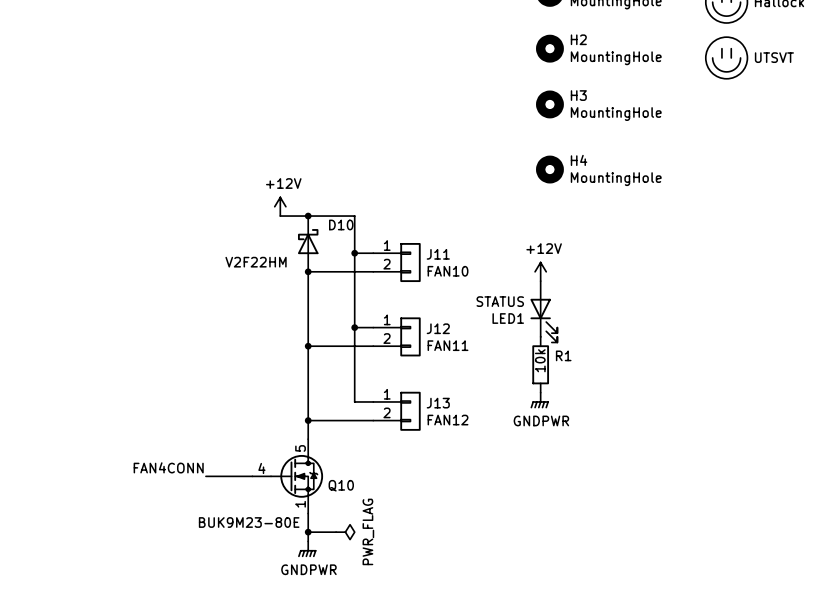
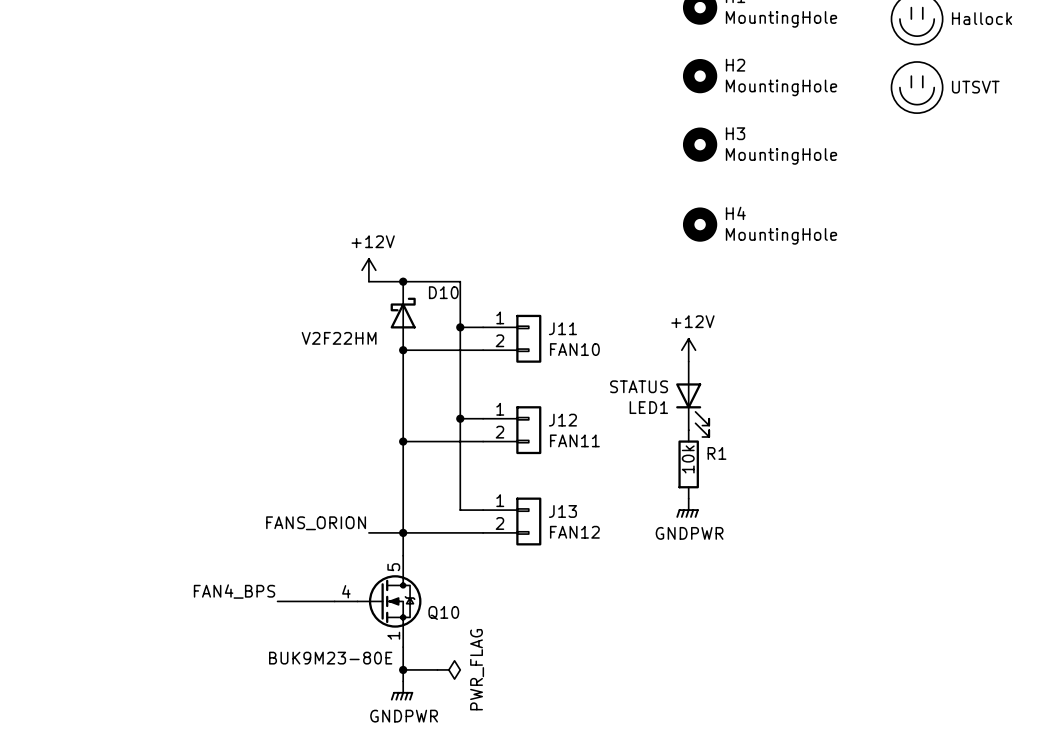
label: none -> FANS_ORION (316, 523)
wire: none -> (368, 532) (403, 532)
label: FAN4CONN (168, 467) -> FAN4_BPS (234, 591)

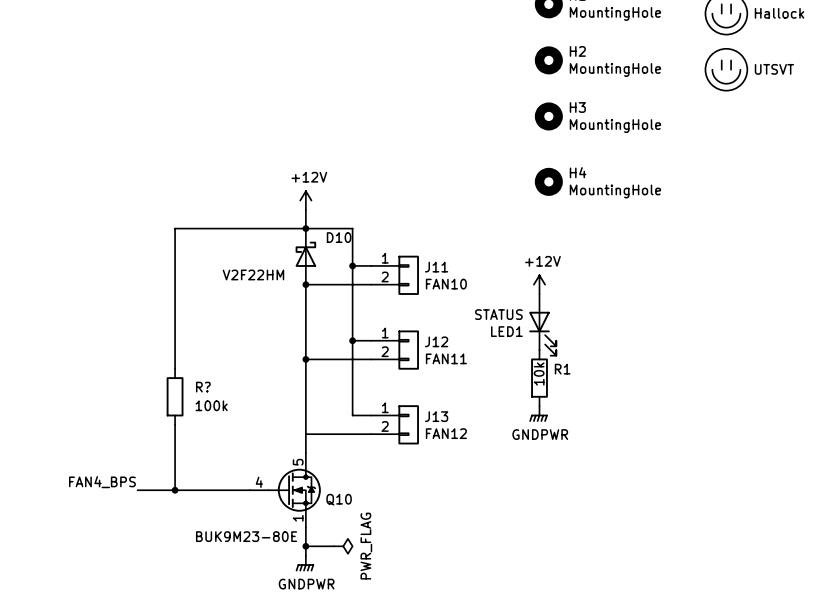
wire: none -> (305, 209) (305, 228)
power symbol position: +12V (368, 270) -> +12V (305, 200)
wire: none -> (277, 228) (175, 228) (175, 368)
R?: none -> 100k (175, 396)
wire: none -> (175, 424) (175, 490)
label: FANS_ORION (316, 523) -> none
wire: (368, 532) (403, 532) -> none
junction: (403, 532) -> none
label position: FAN4_BPS (234, 591) -> FAN4_BPS (102, 482)
wire: none -> (137, 490) (203, 490)
junction: none -> (175, 490)

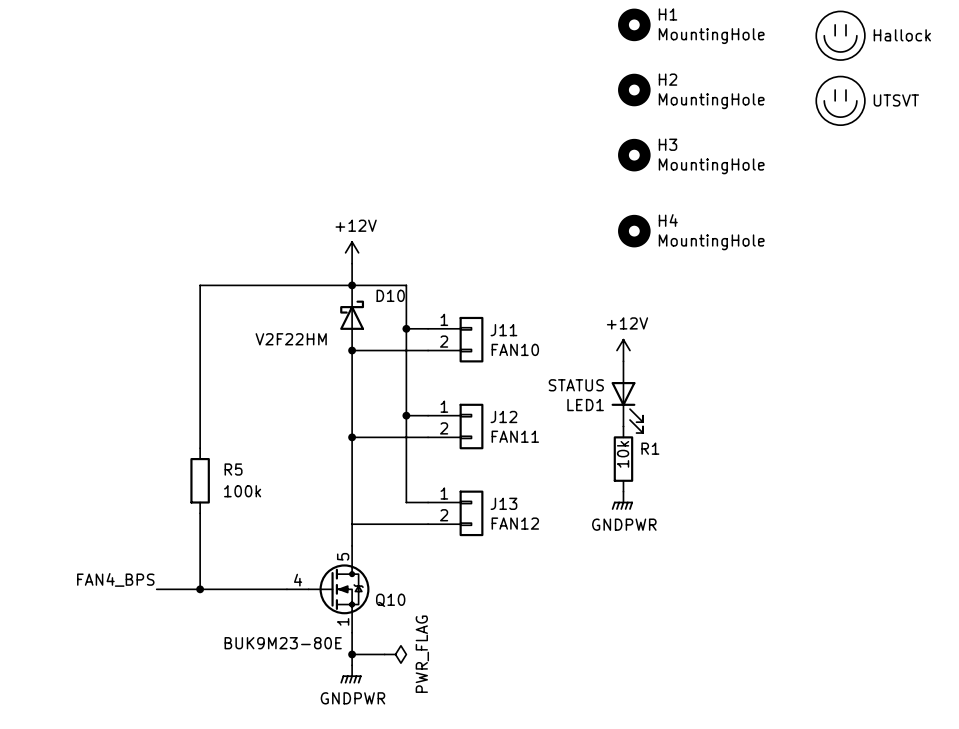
R? name: R? (203, 387) -> R5 (233, 469)

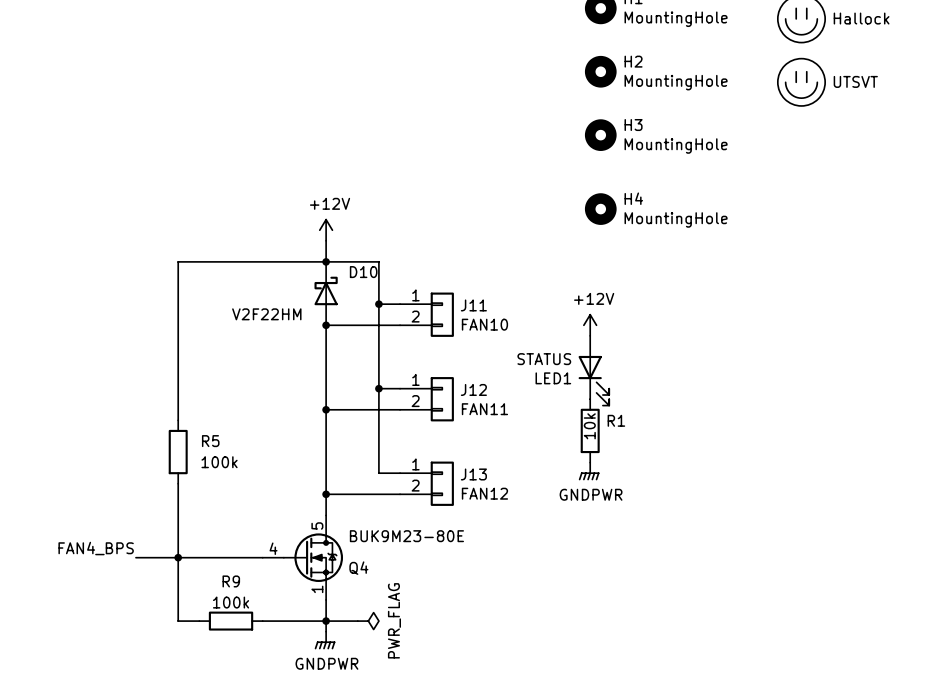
junction: none -> (326, 494)
wire: none -> (178, 557) (178, 621) (199, 621)
Q10 name: Q10 (390, 600) -> Q4 (358, 568)
Q10 value position: BUK9M23-80E (283, 643) -> BUK9M23-80E (406, 536)
R9: none -> 100k (231, 621)
wire: none -> (262, 621) (326, 621)

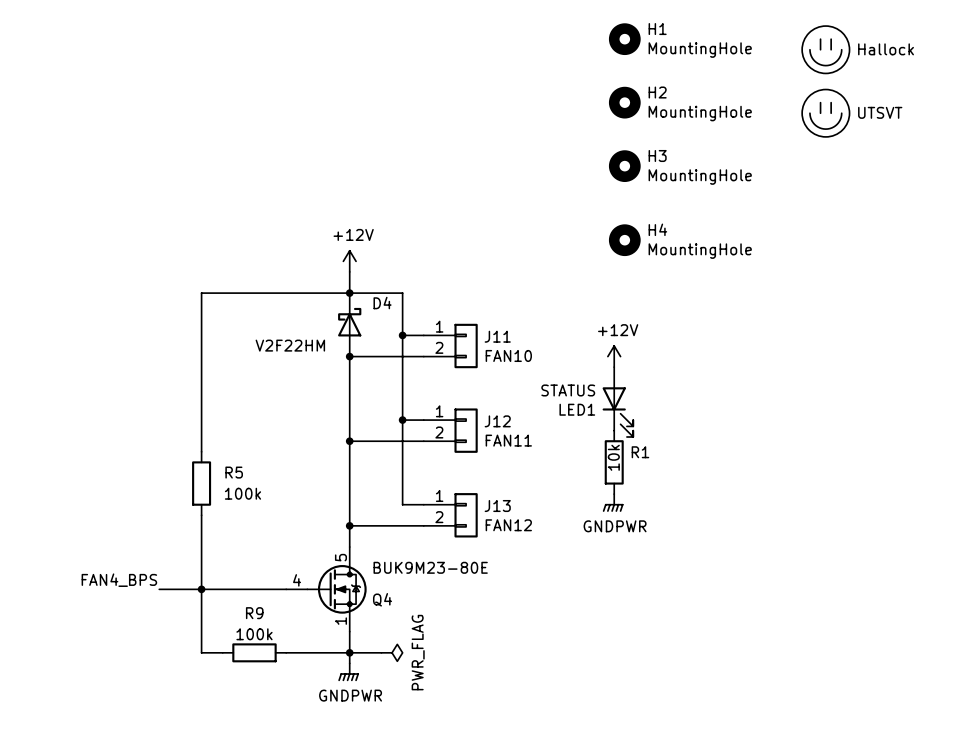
D10 name: D10 (363, 272) -> D4 (382, 303)

